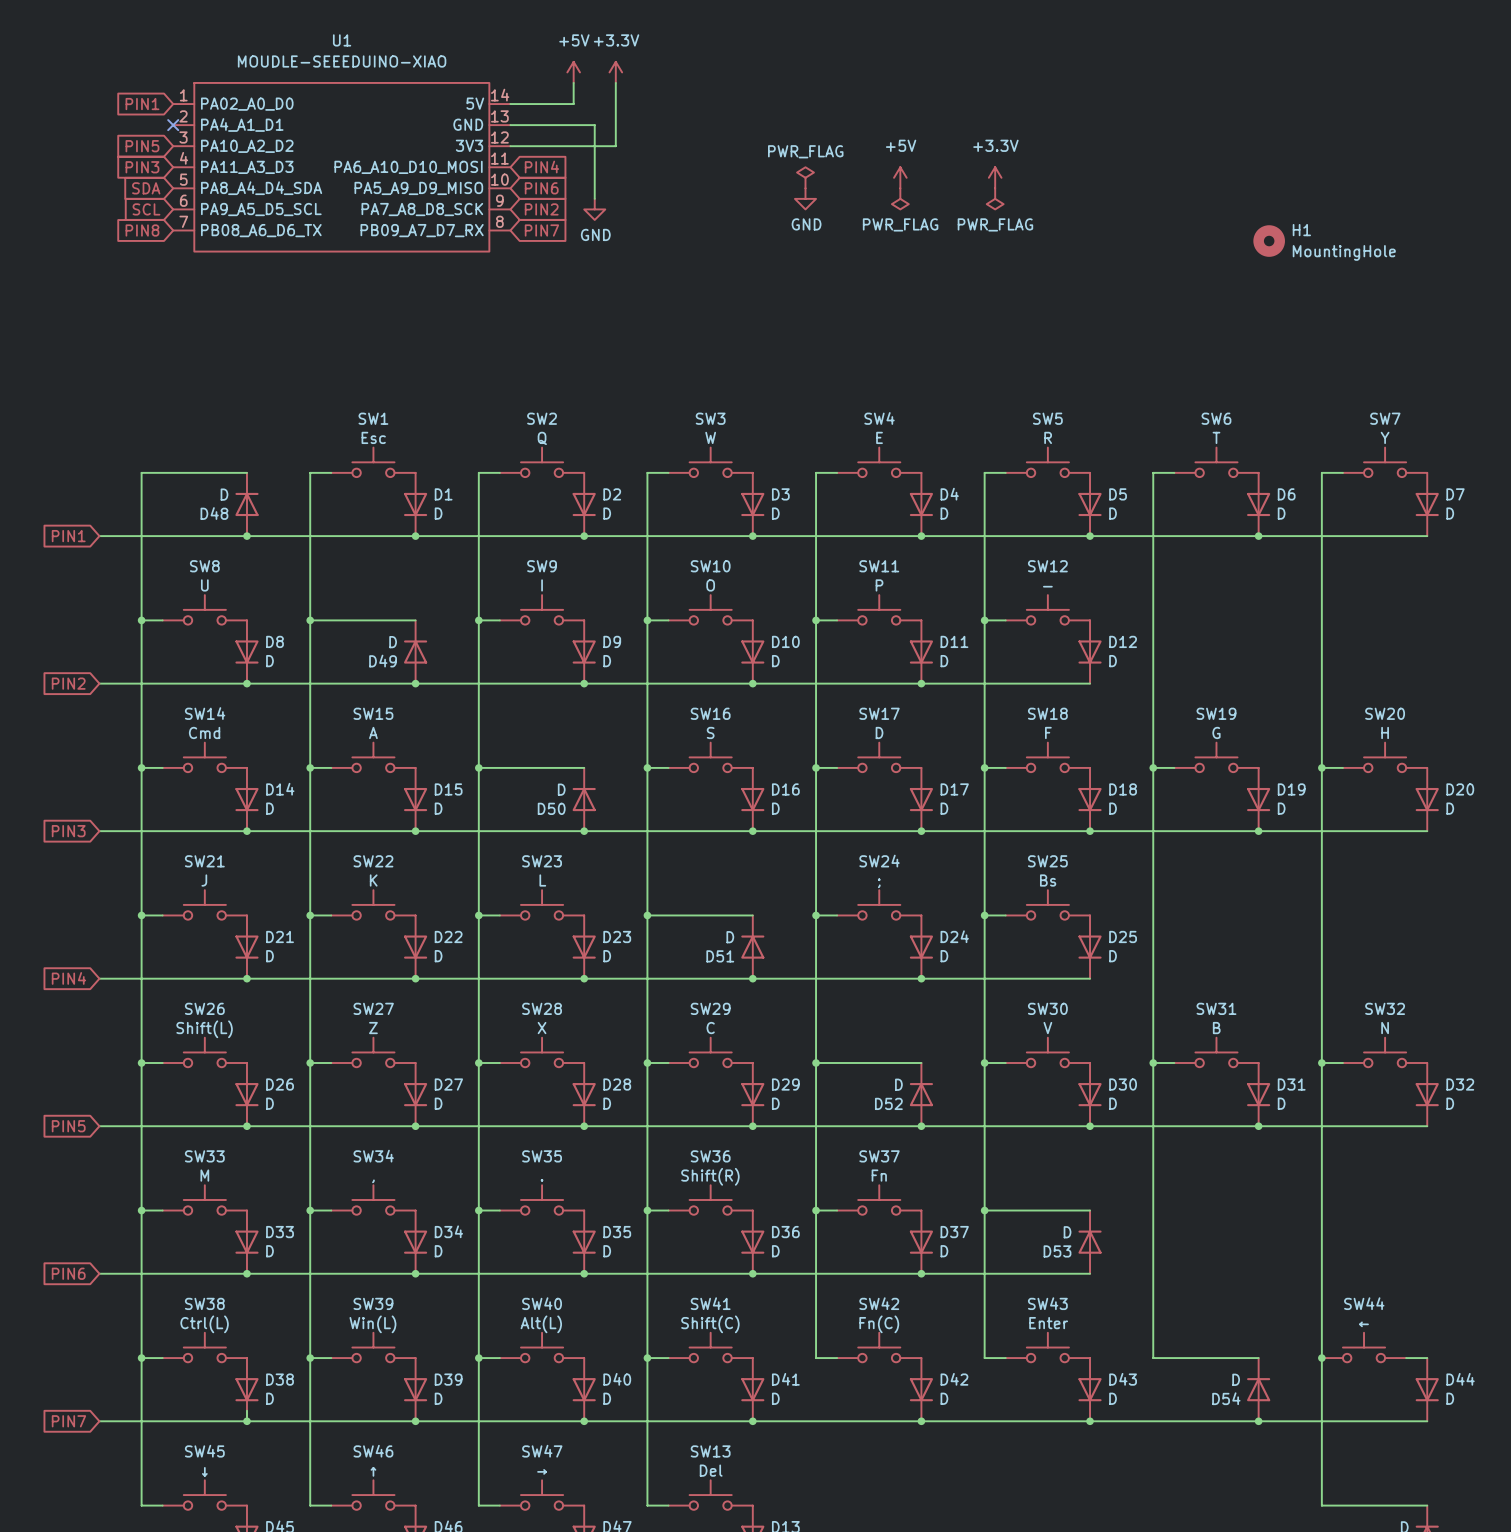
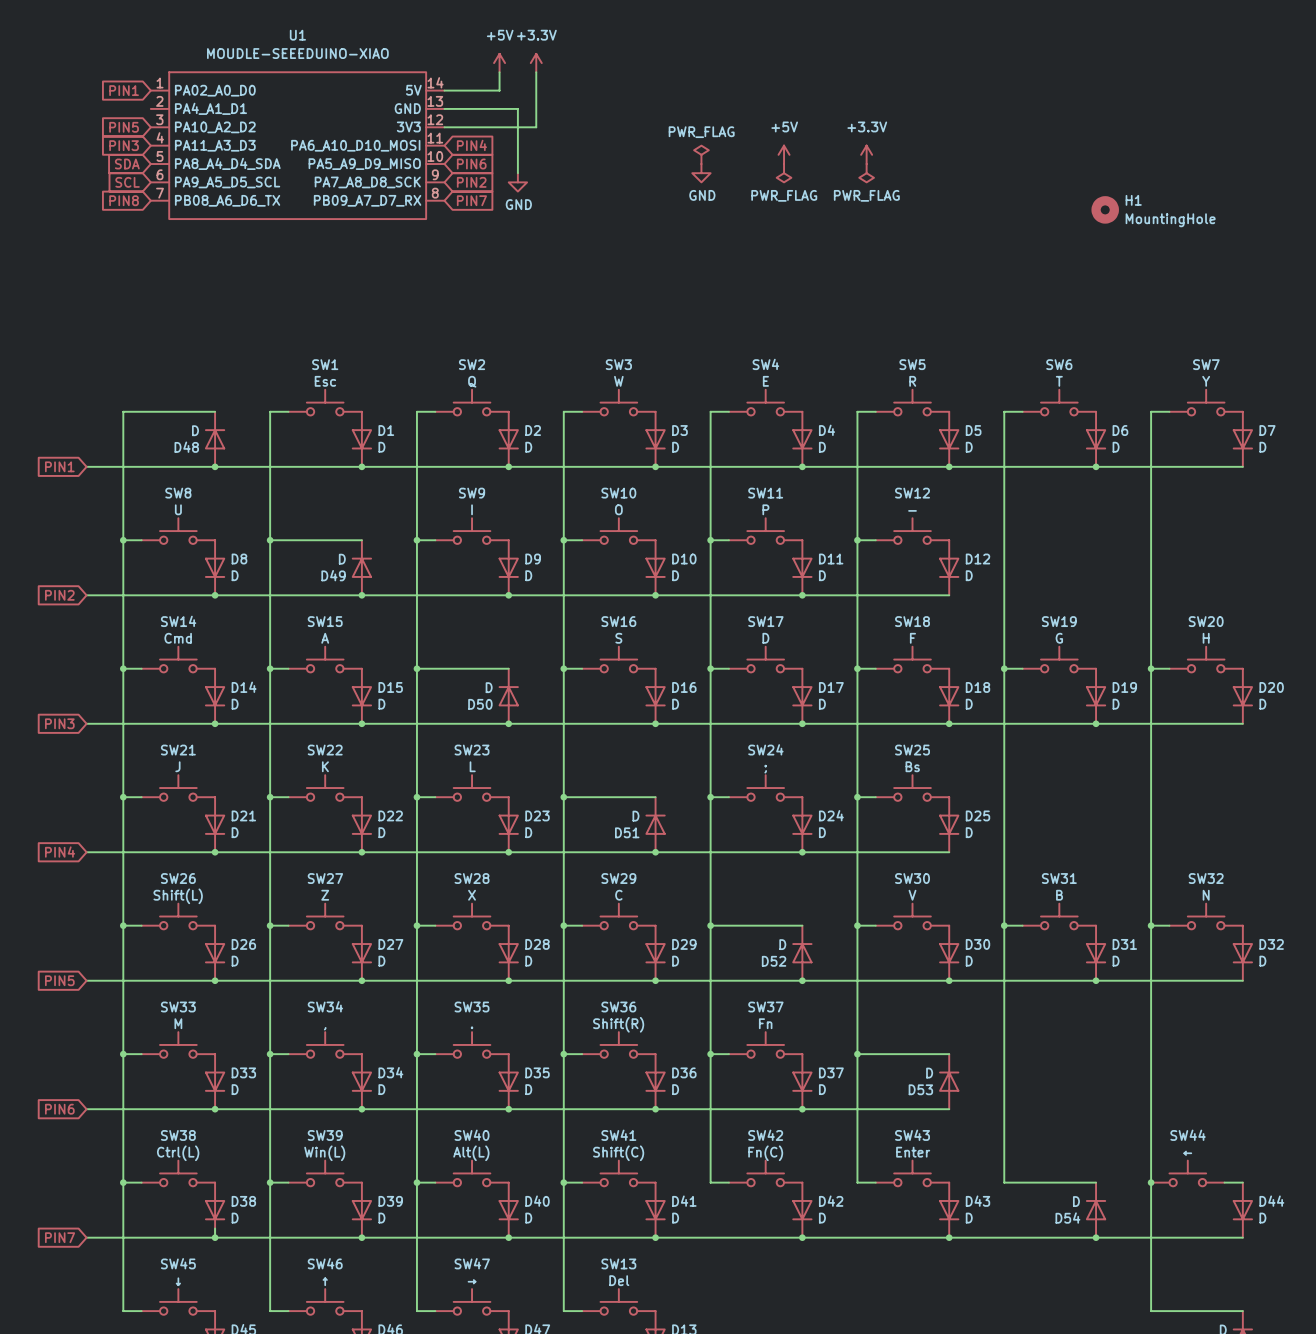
no-connect mark: (173, 125) -> none

